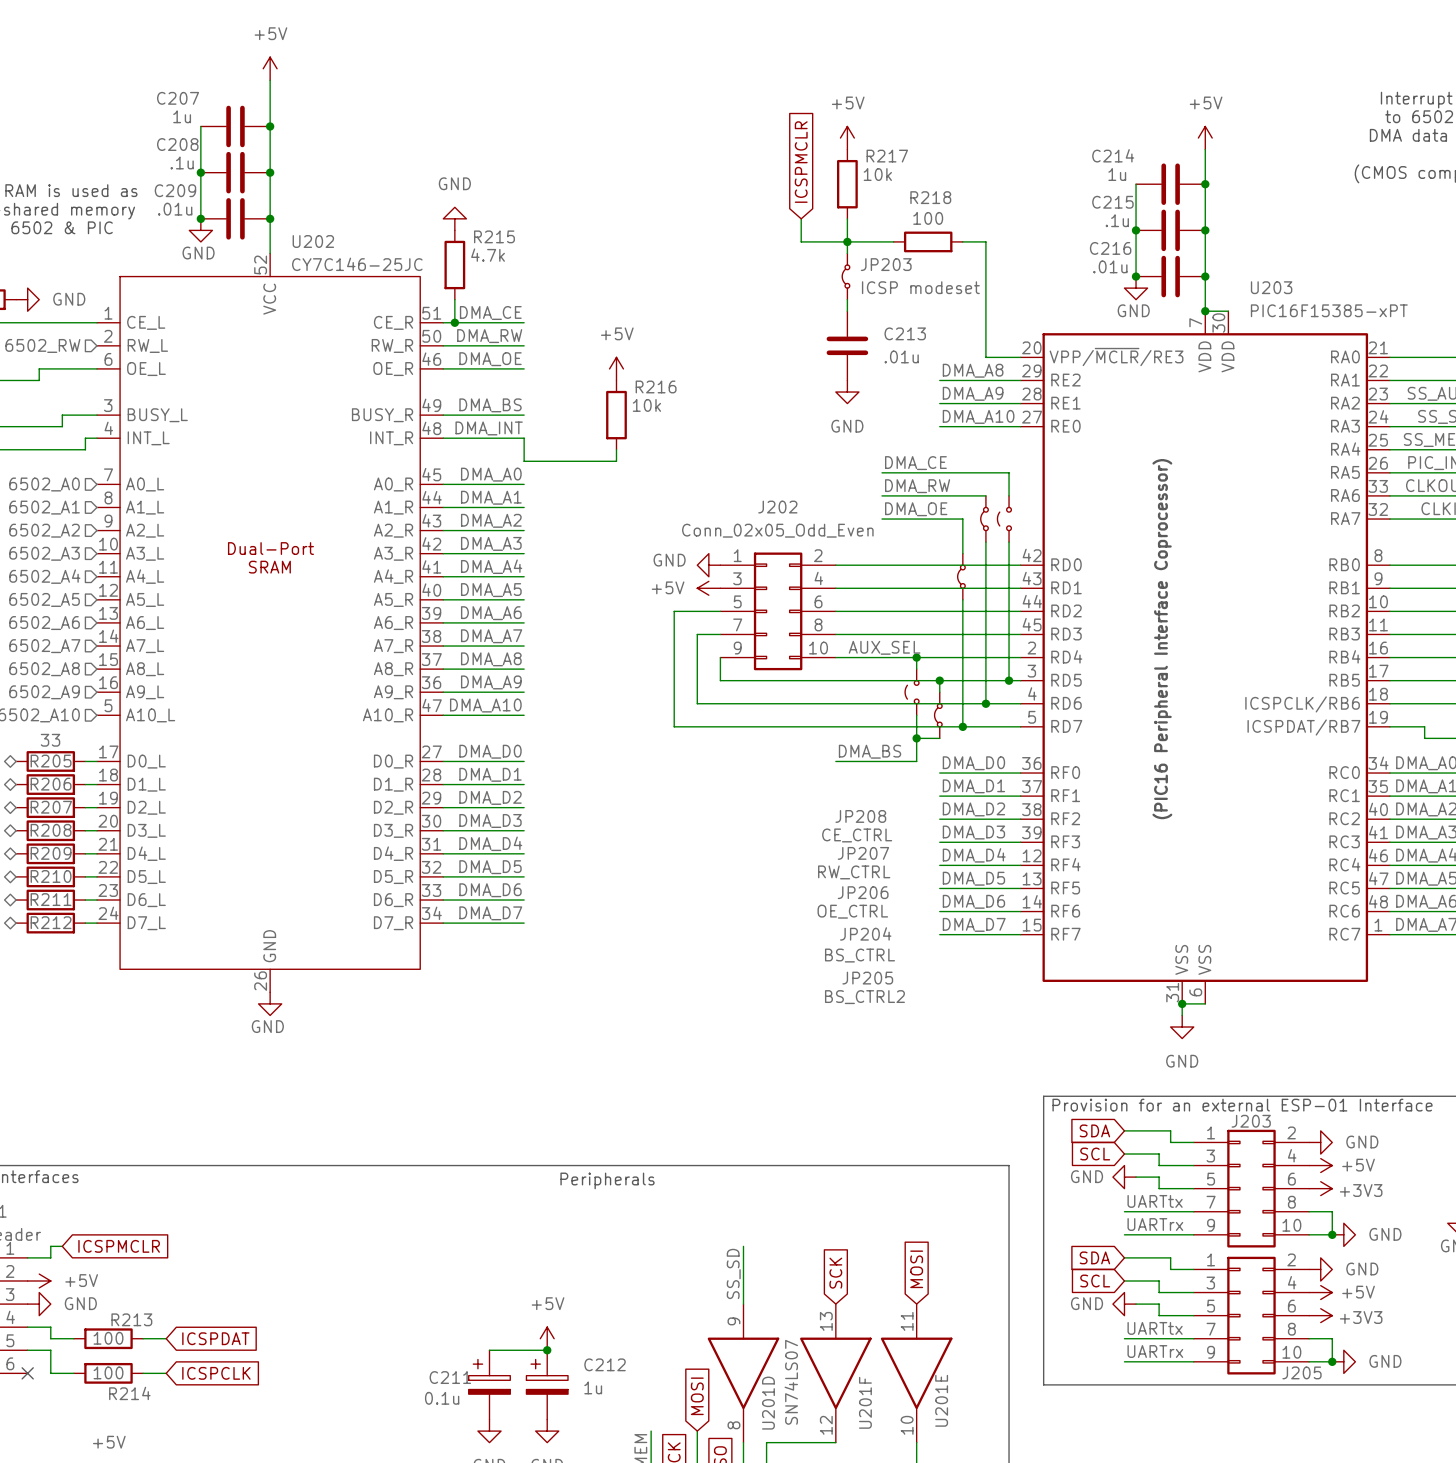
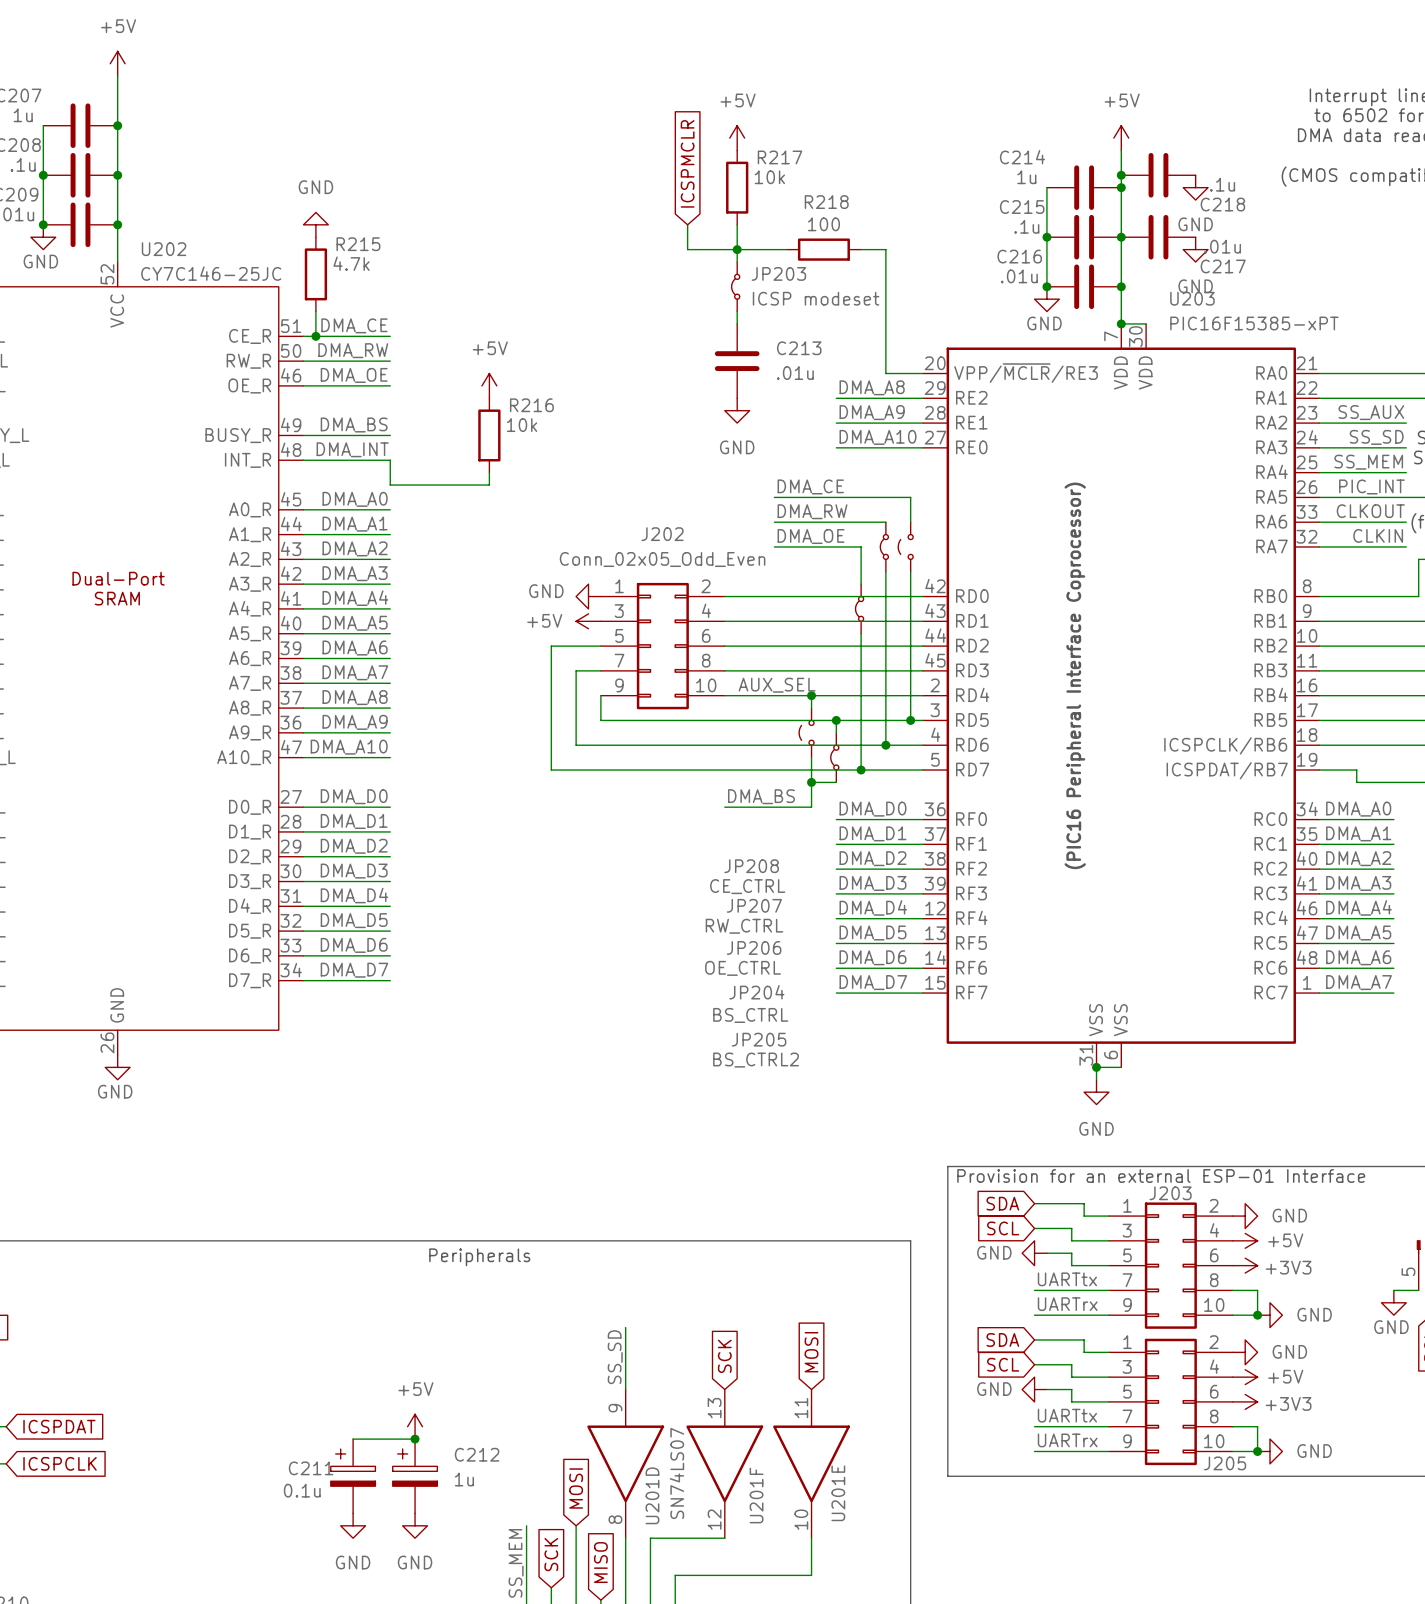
junction: none -> (1121, 175)
C218: none -> .1u (1158, 175)
power symbol: none -> GND (1195, 187)
C217: none -> .01u (1158, 237)
power symbol: none -> GND (1195, 249)

